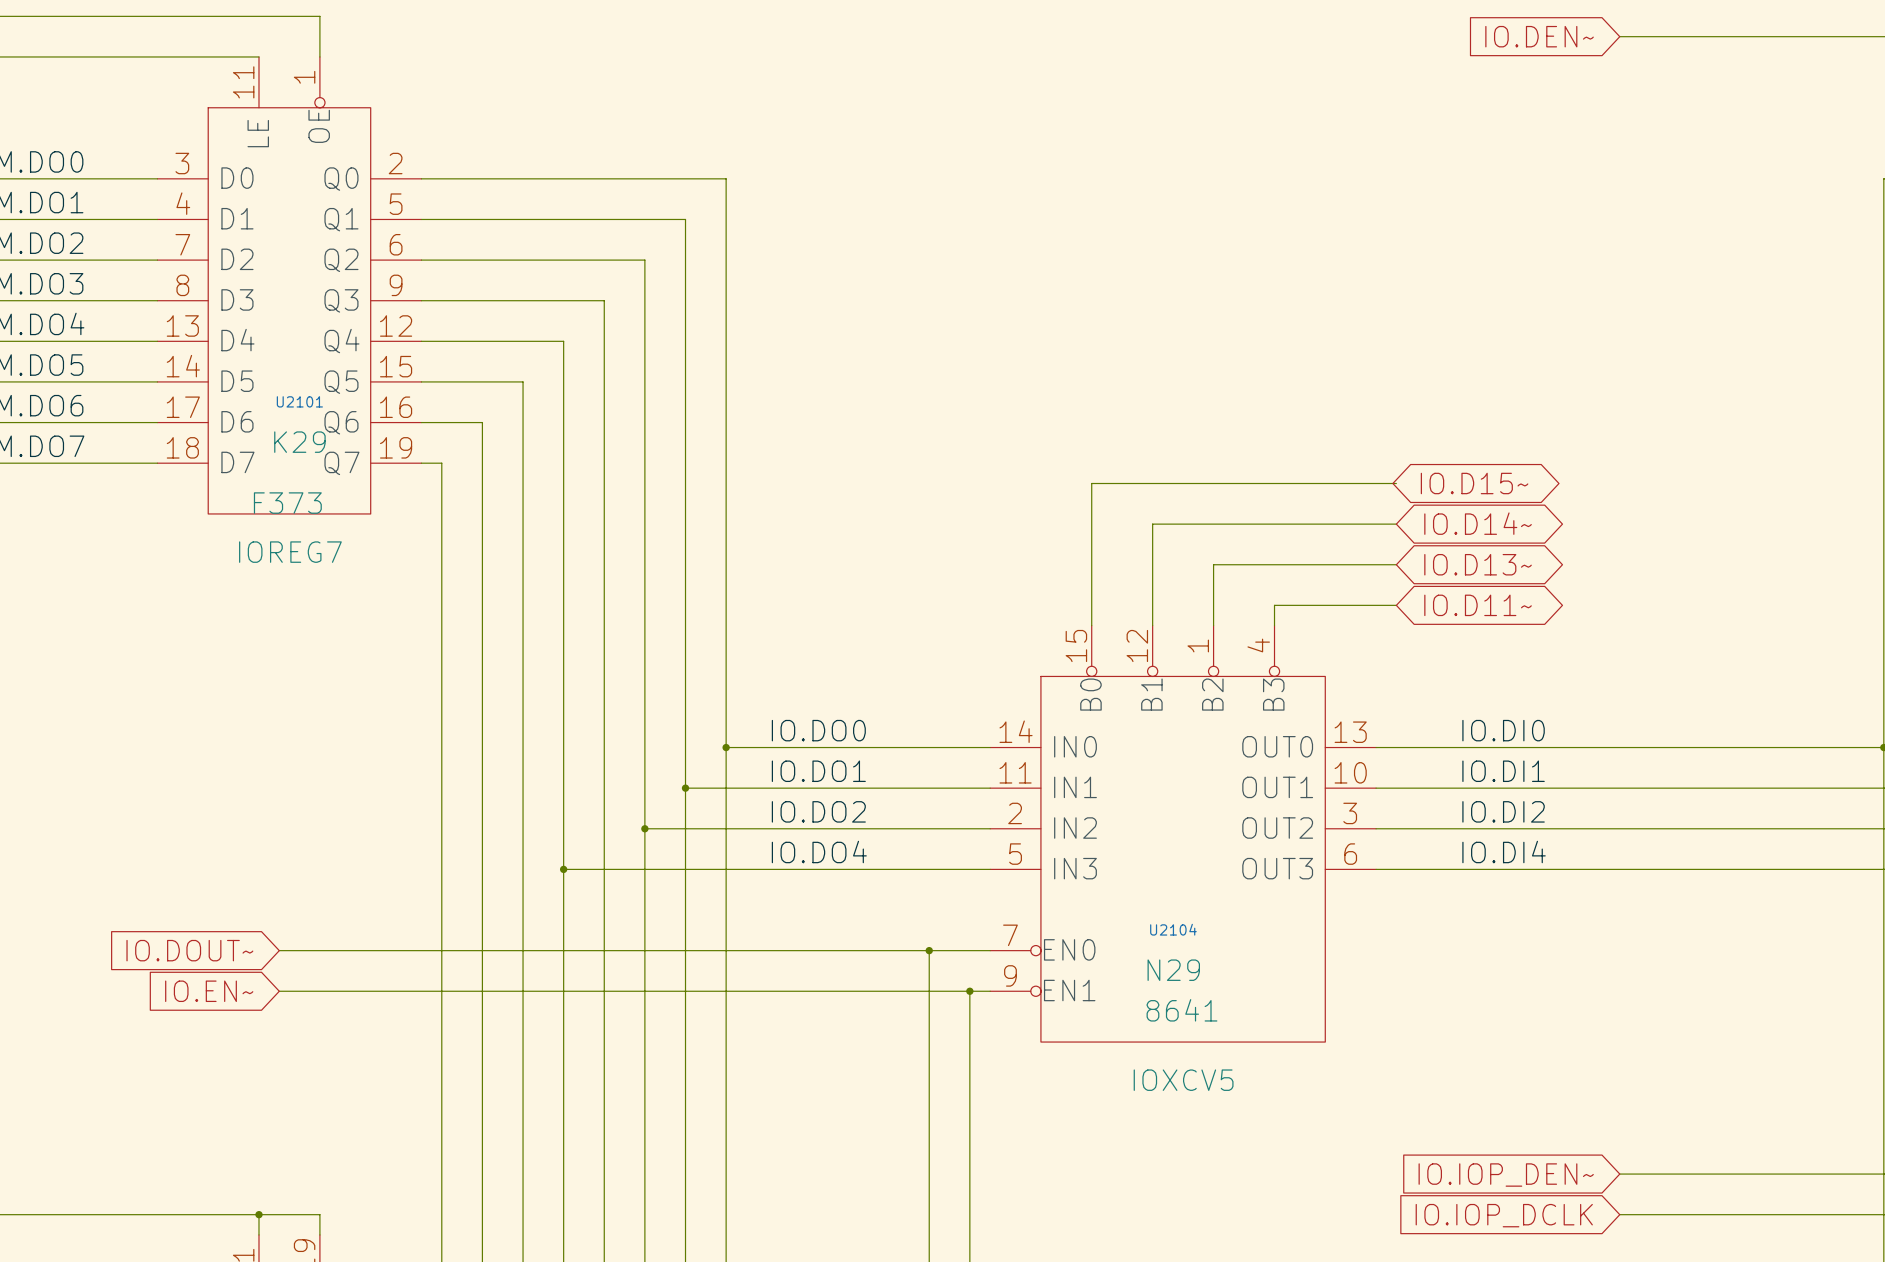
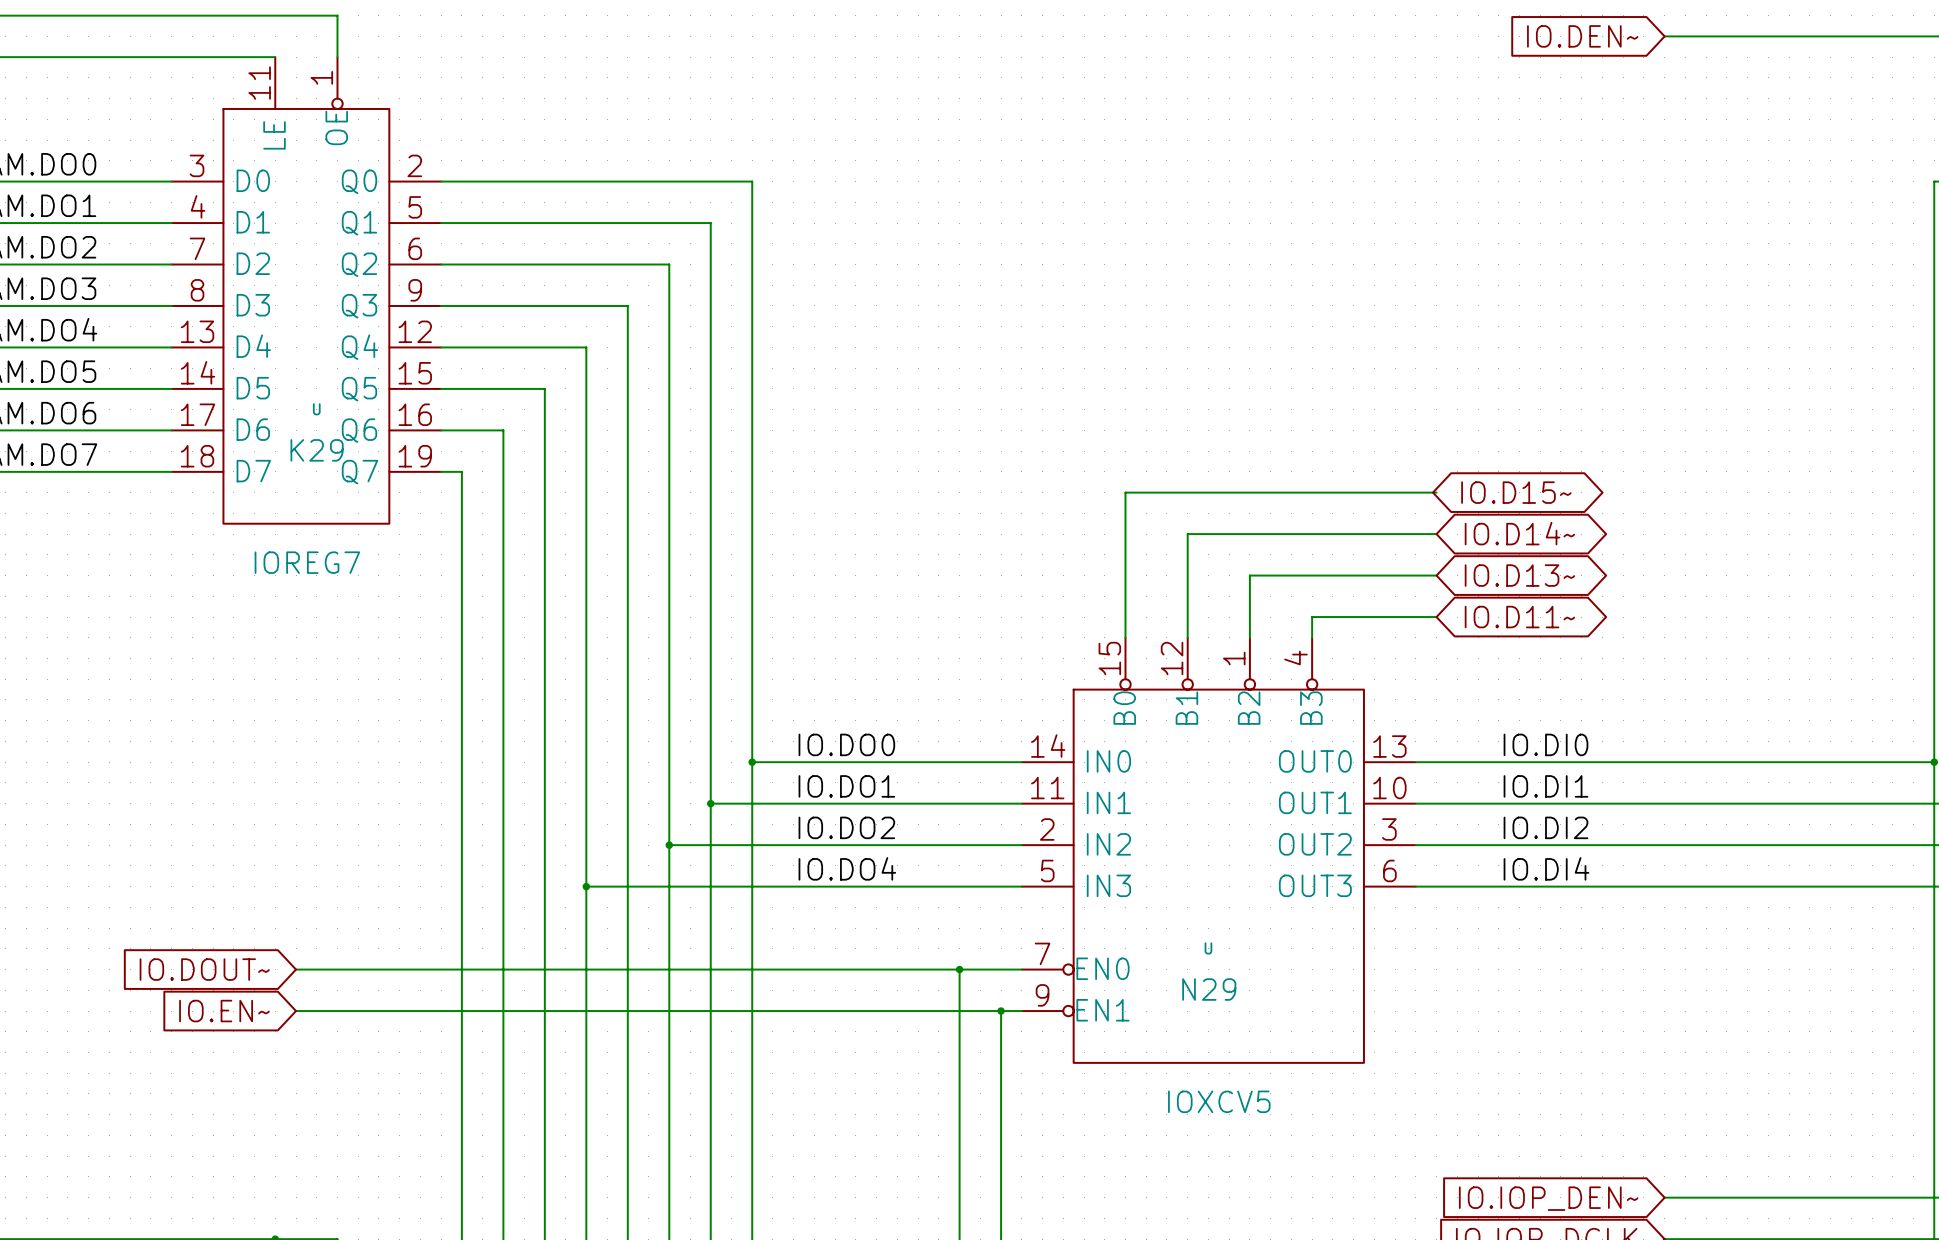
U2101 name: U2101 (299, 401) -> U (316, 409)
U2101 value: F373 (287, 503) -> none
U2104 name: U2104 (1173, 929) -> U (1208, 948)
U2104 value: 8641 (1181, 1010) -> none

